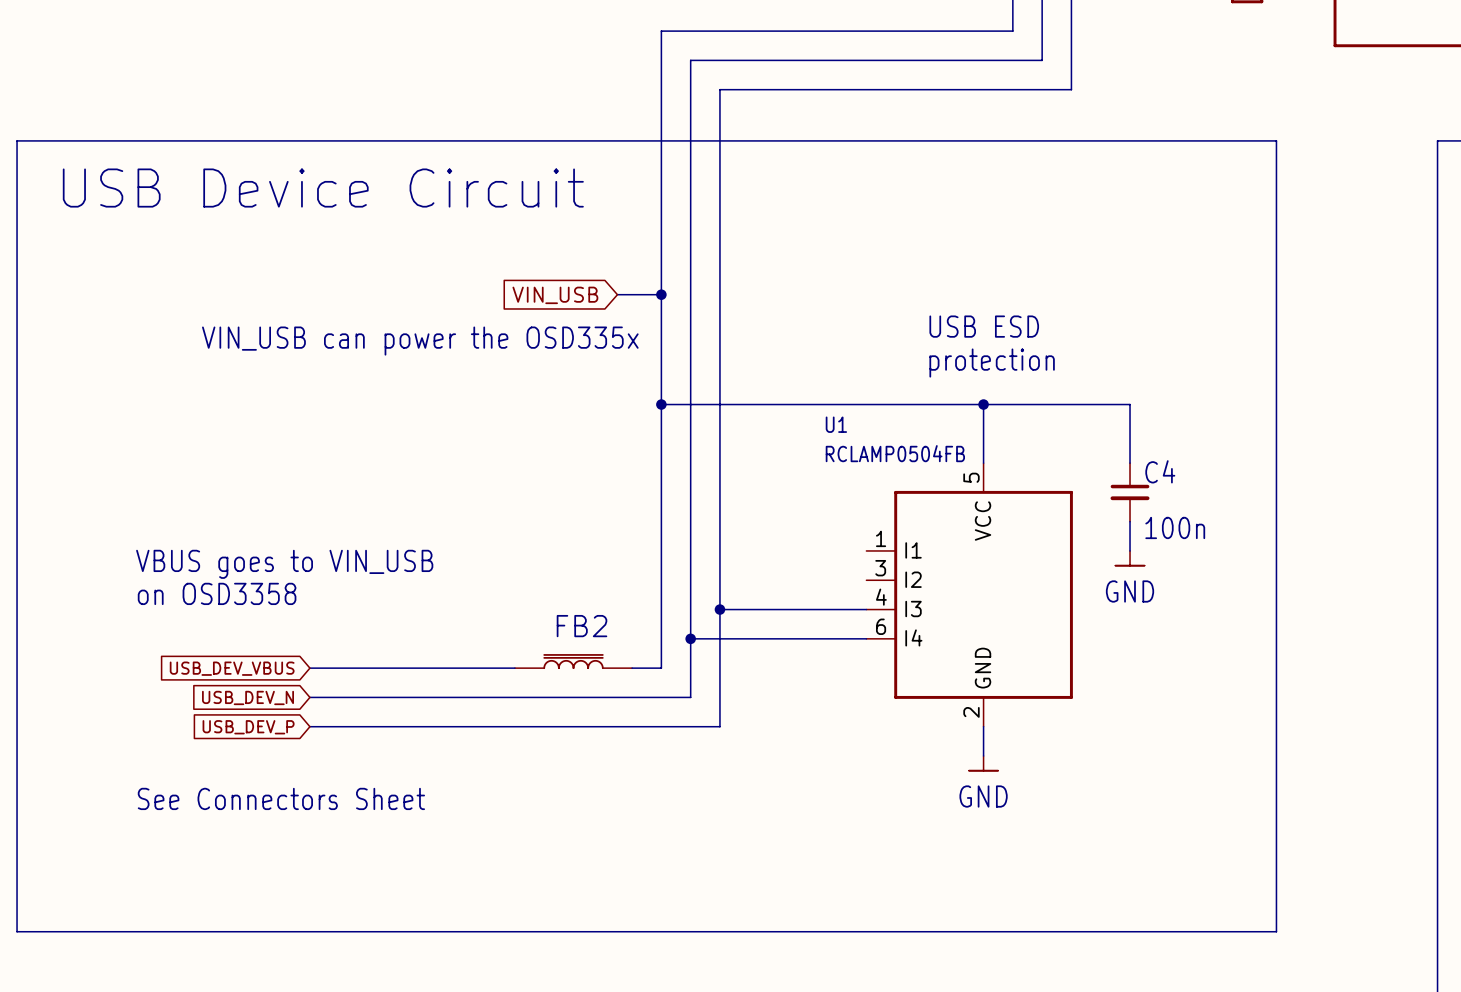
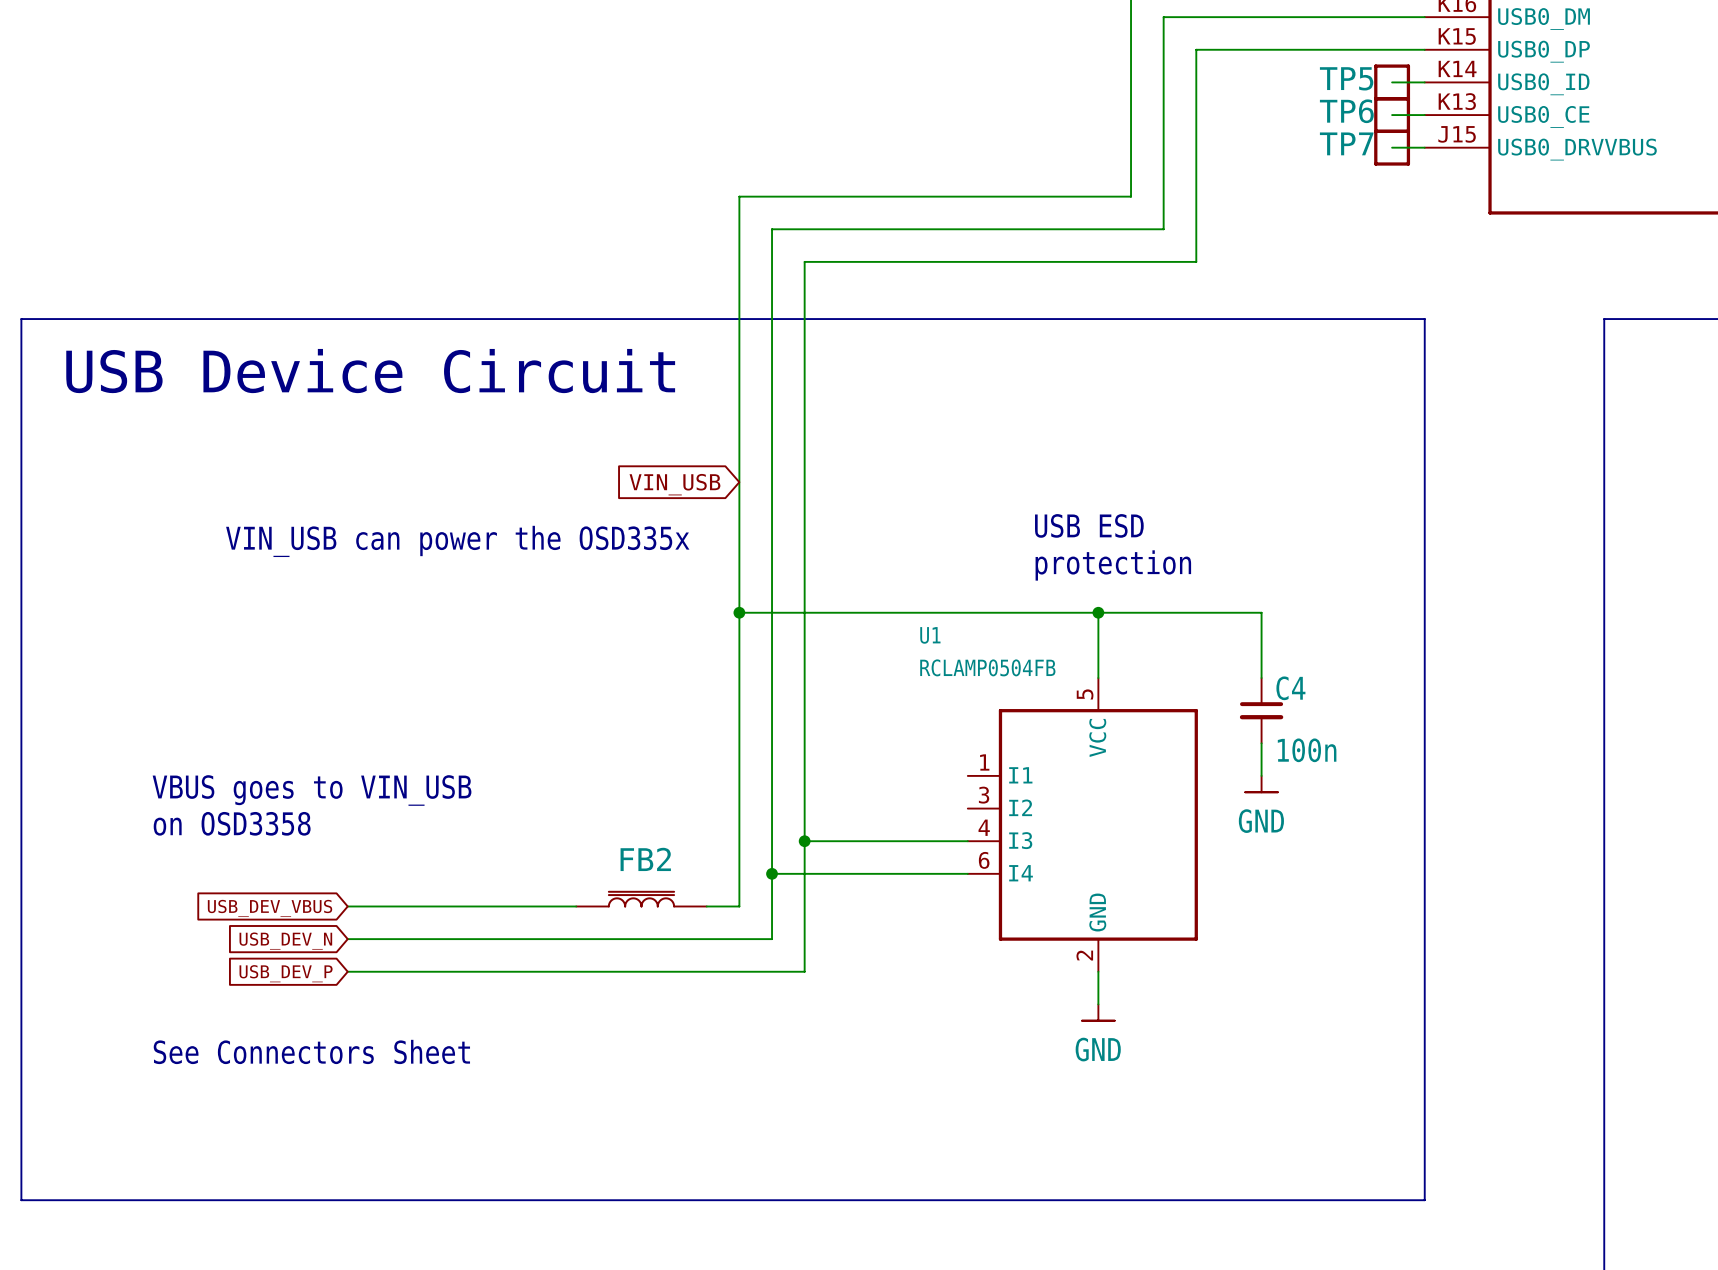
wire: (617, 294) (661, 294) -> none
junction: (661, 294) -> none
global label position: VIN_USB (555, 295) -> VIN_USB (674, 484)

